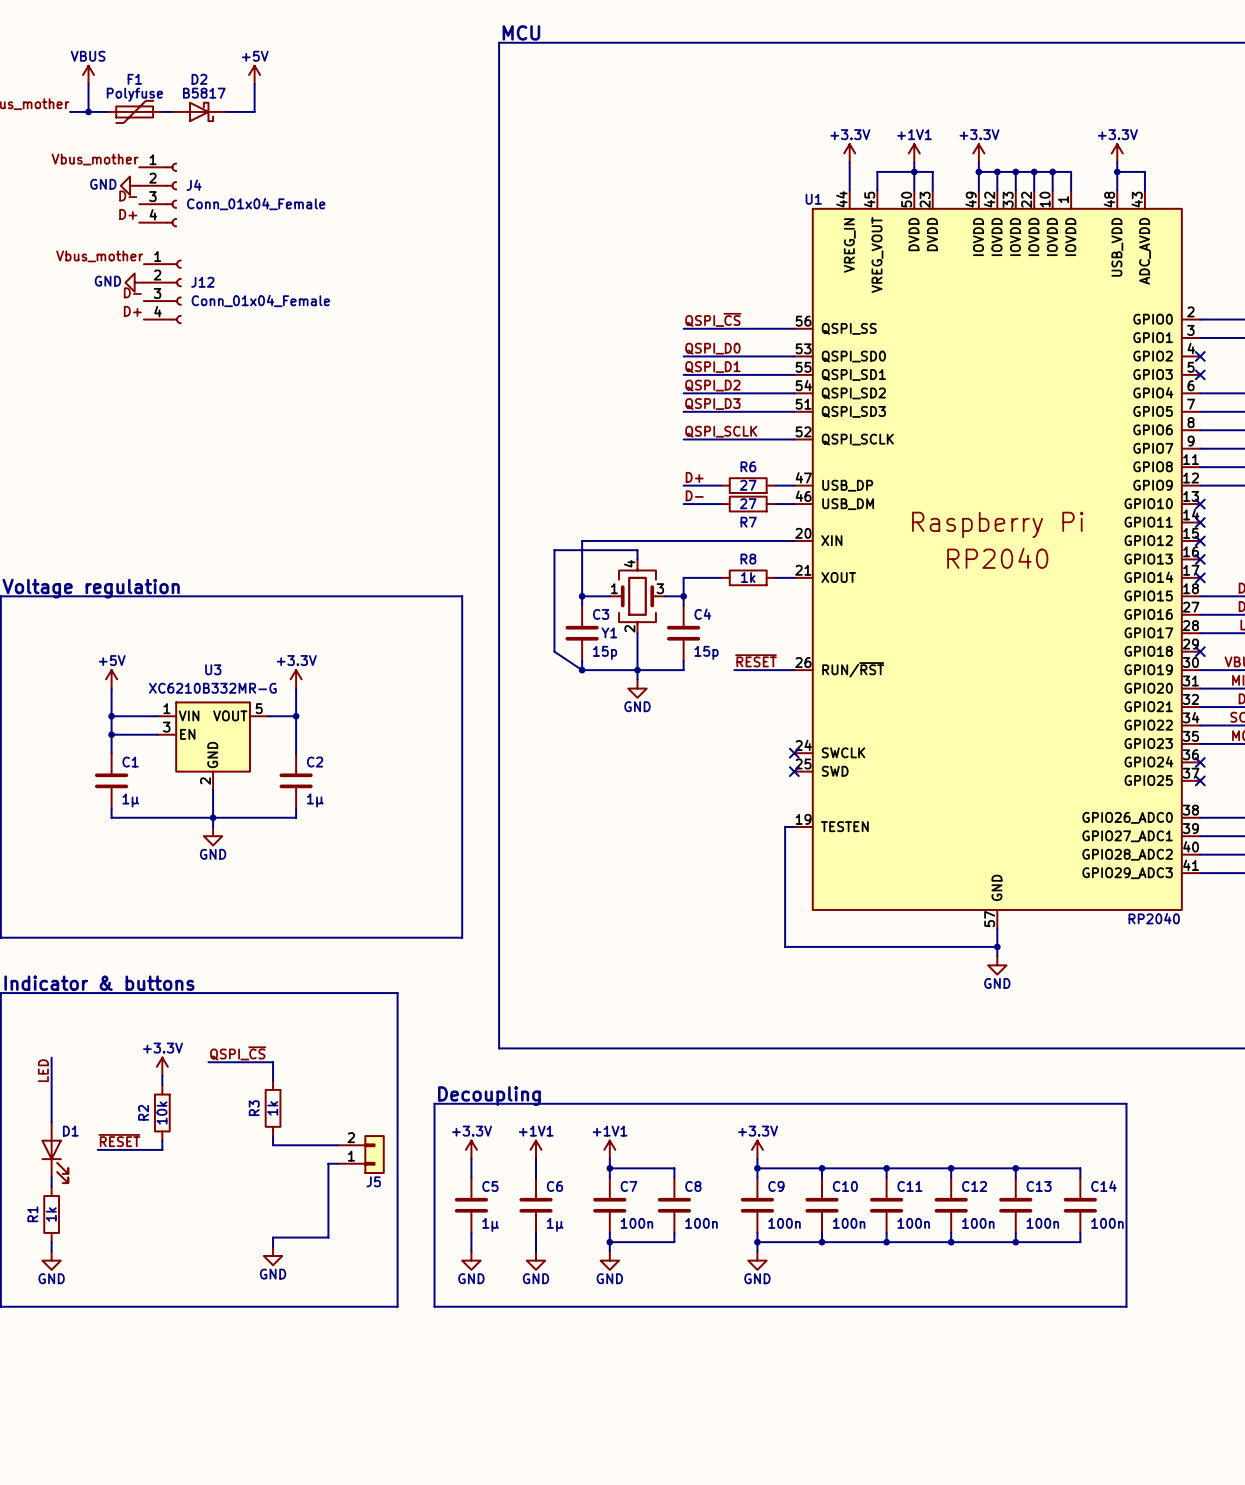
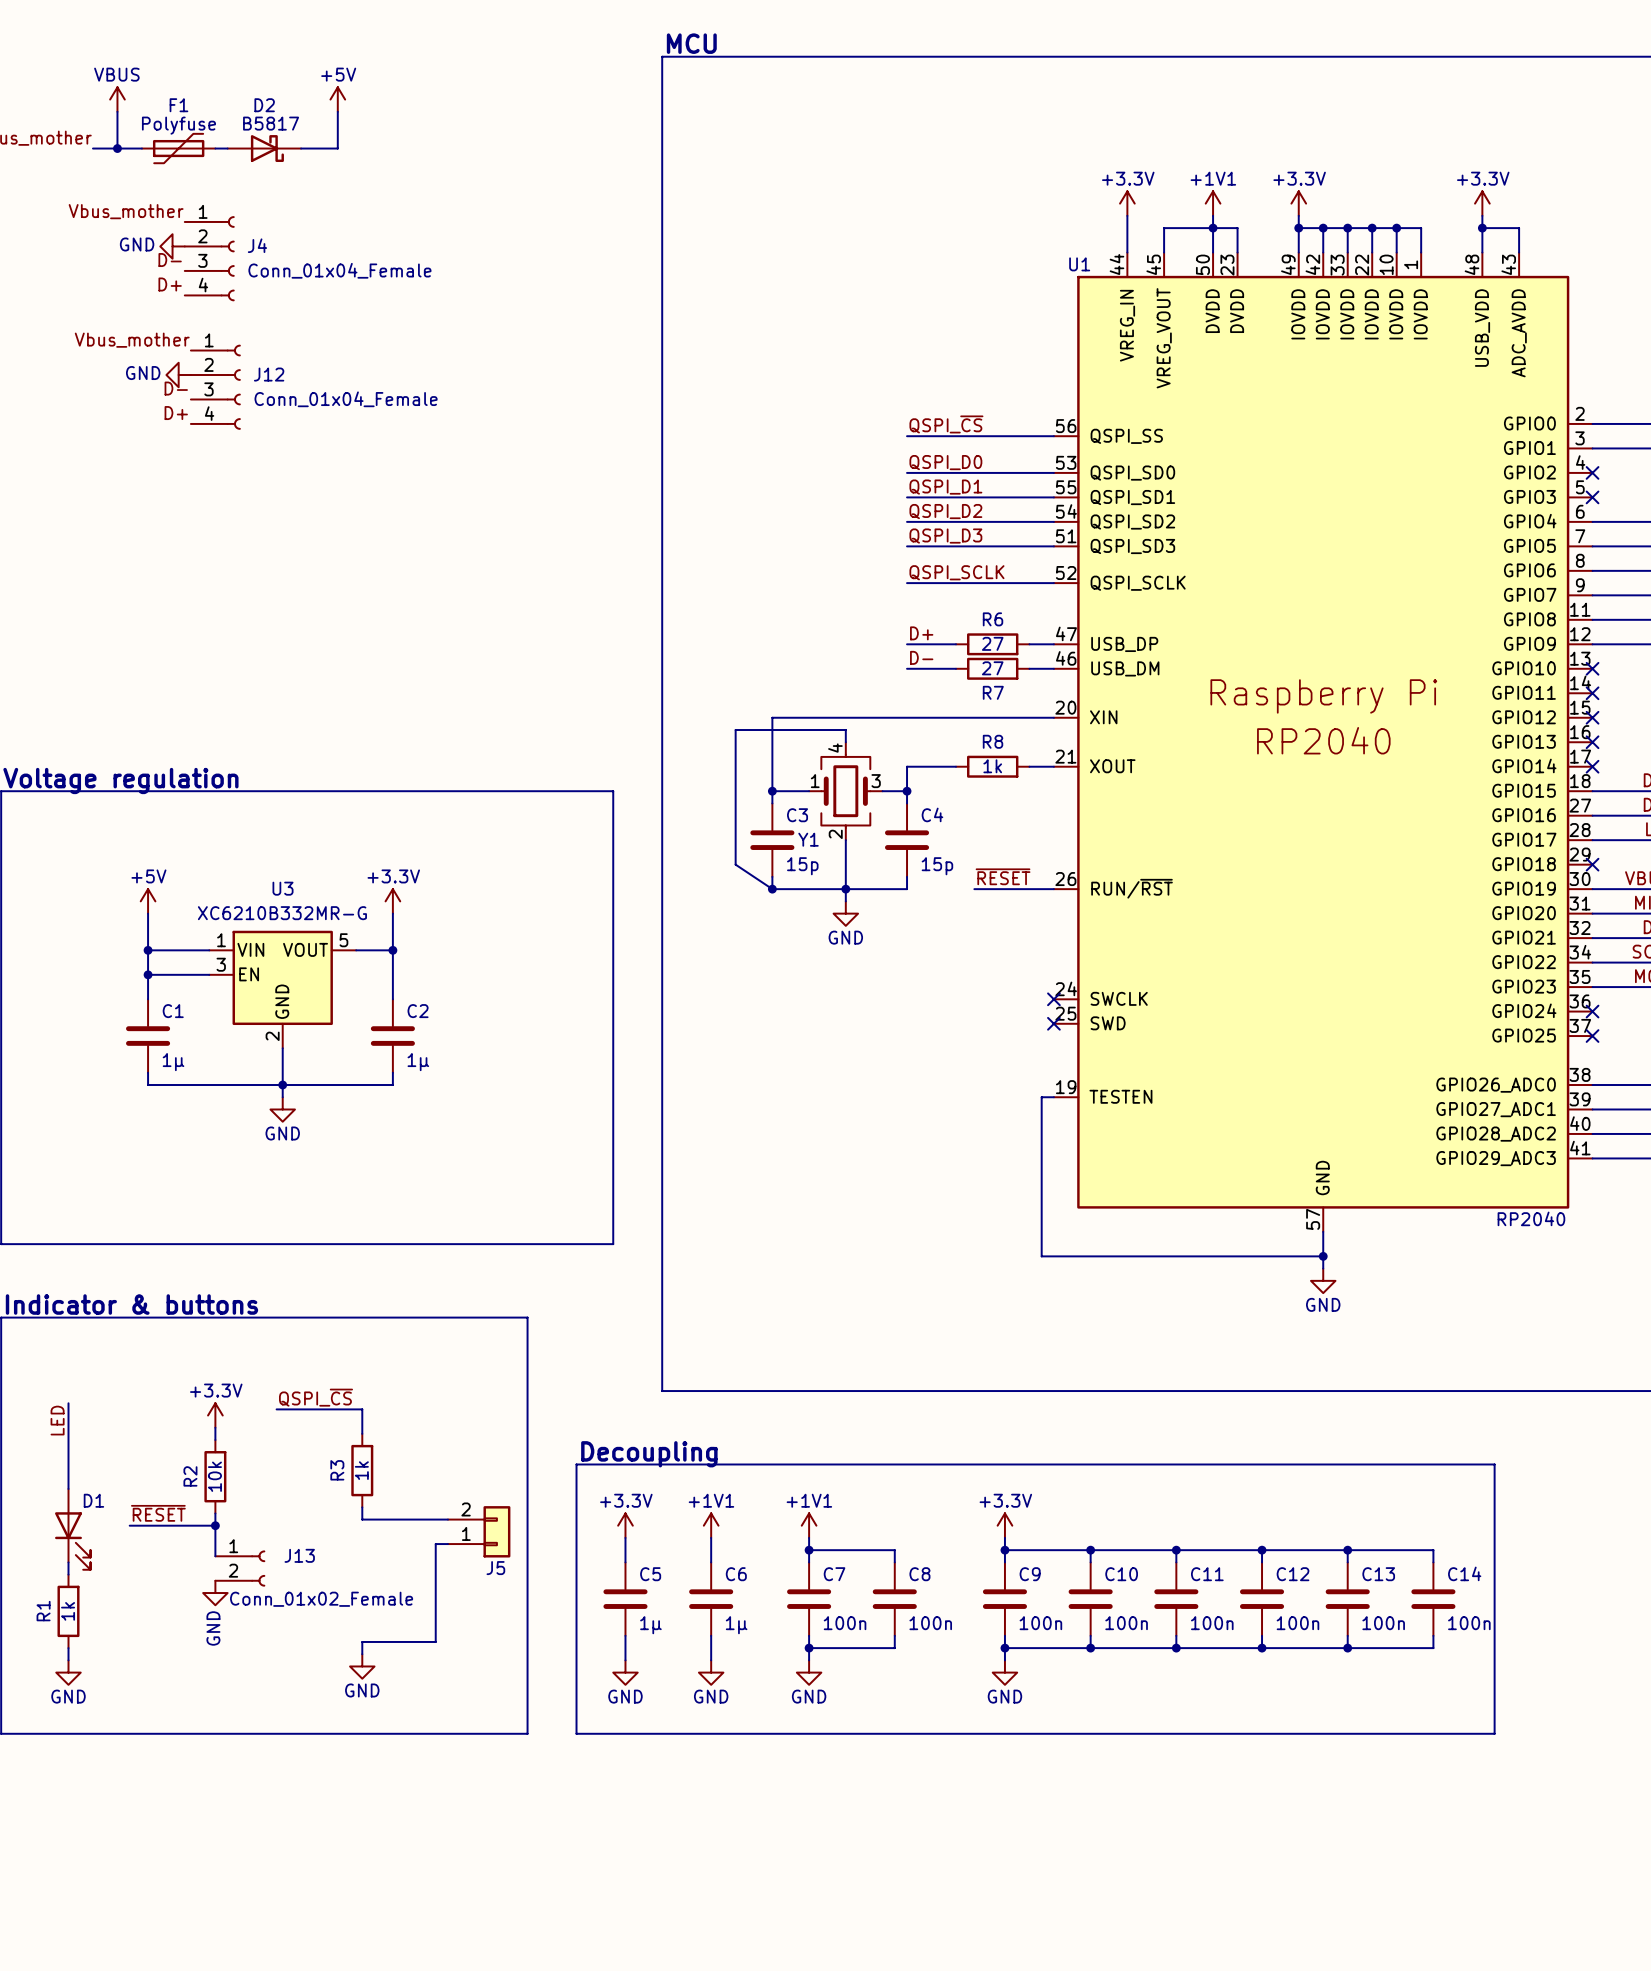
wire: none -> (215, 1525) (215, 1556)
junction: none -> (215, 1525)
J13: none -> Conn_01x02_Female (240, 1568)
power symbol: none -> GND (215, 1593)

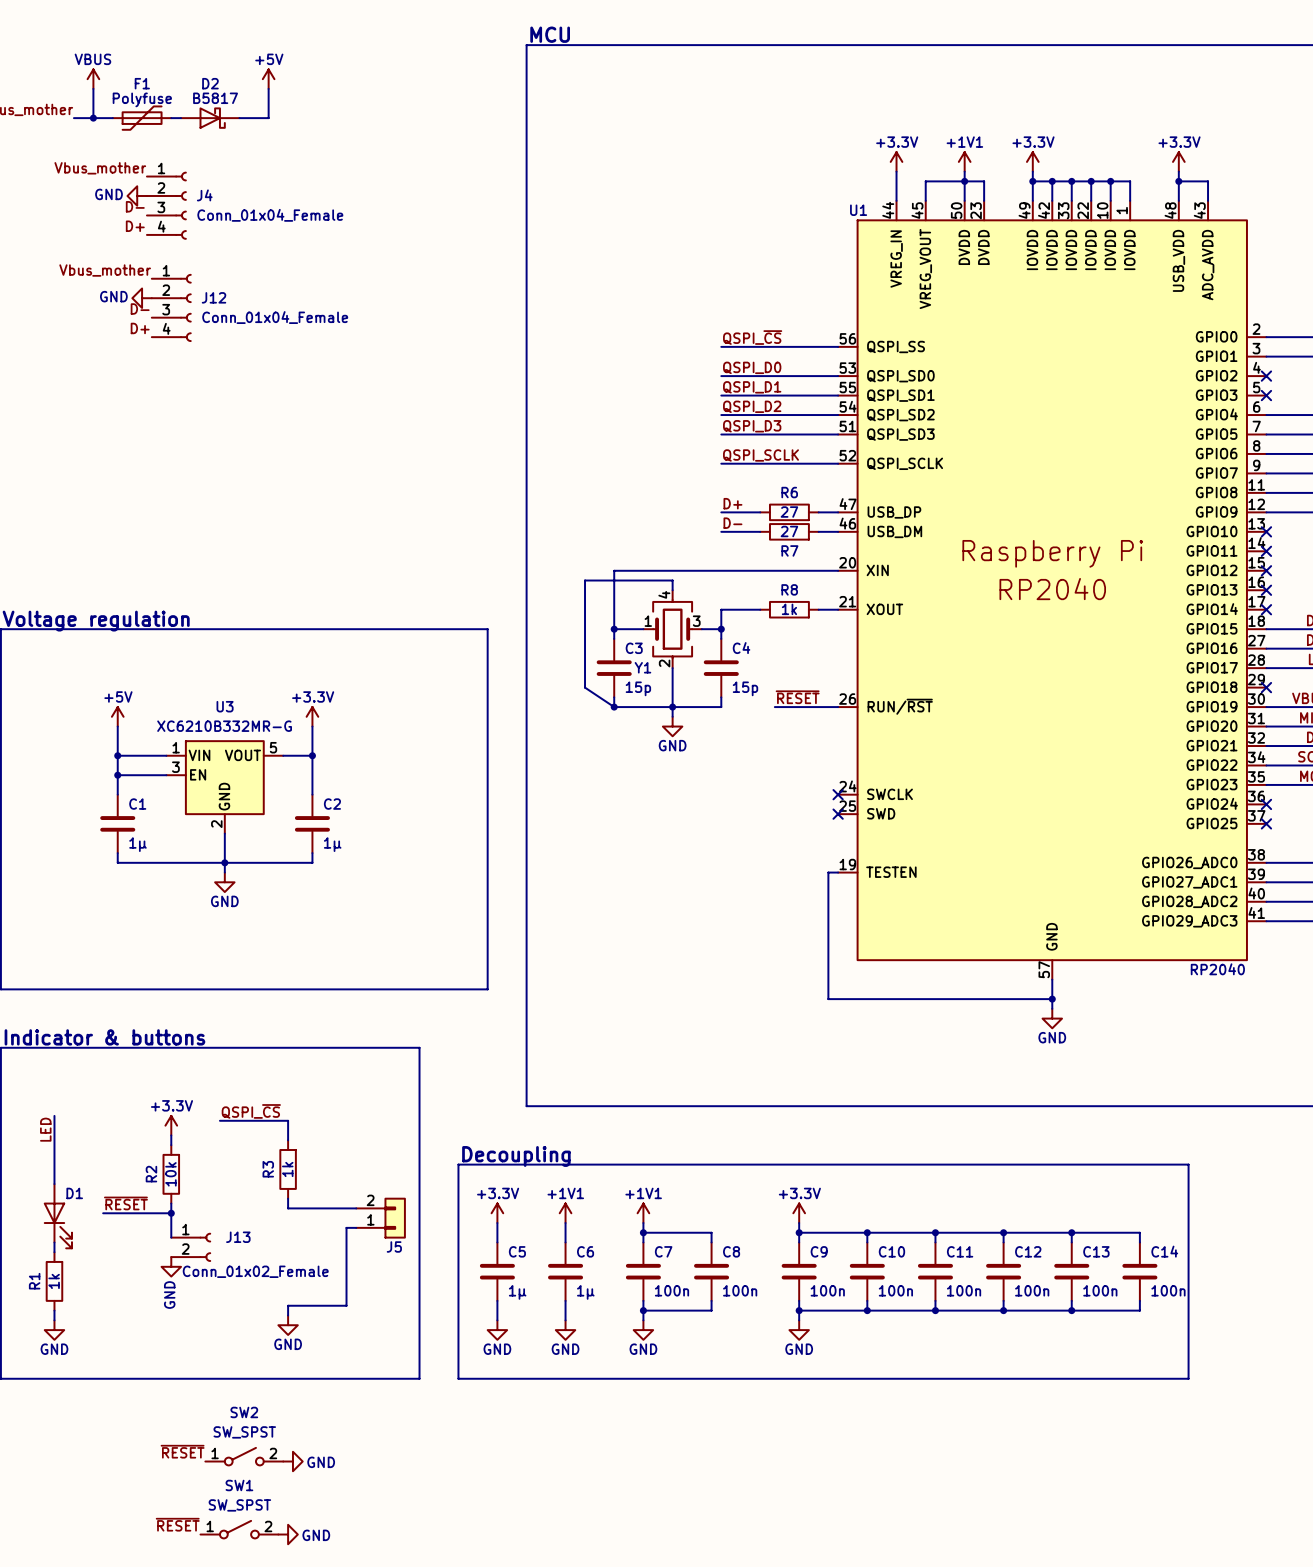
label: none -> ~{RESET} (182, 1451)
SW2: none -> SW_SPST (244, 1456)
power symbol: none -> GND (292, 1461)
label: none -> ~{RESET} (177, 1524)
SW1: none -> SW_SPST (239, 1529)
power symbol: none -> GND (288, 1534)

